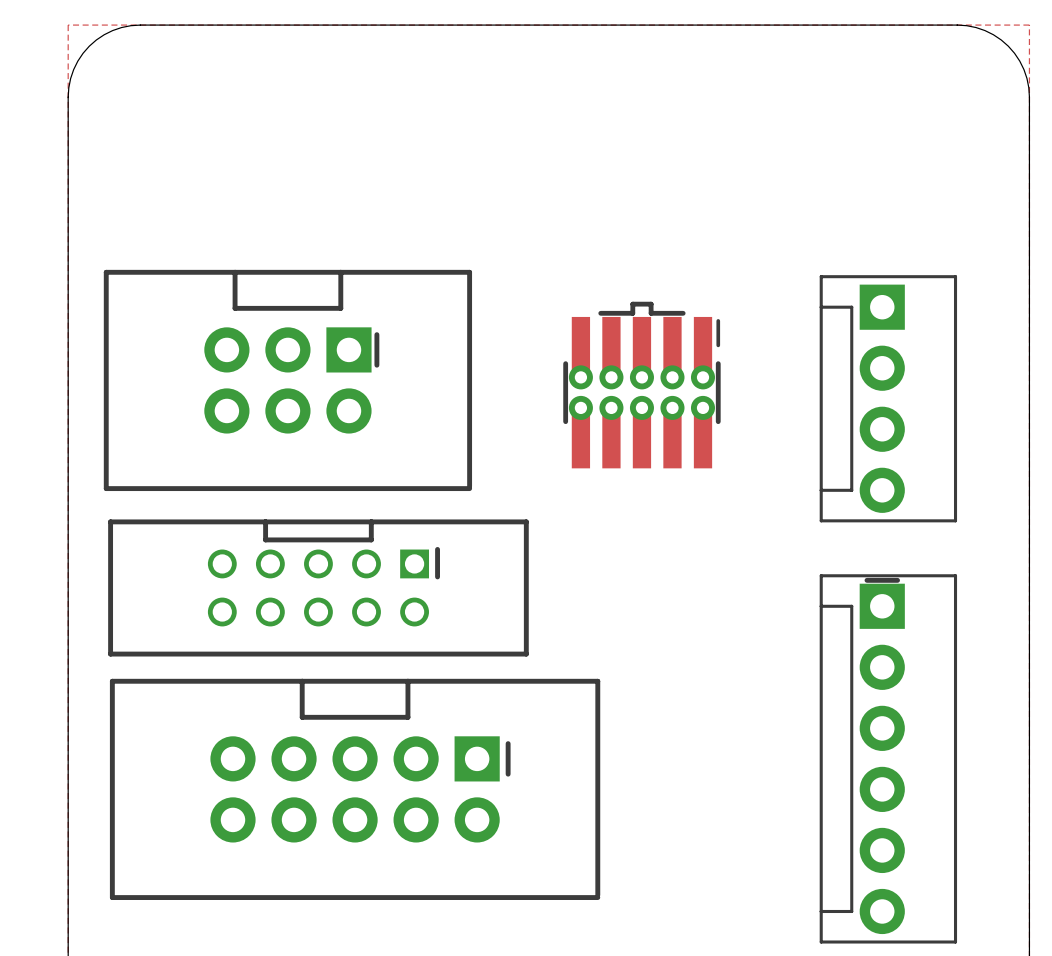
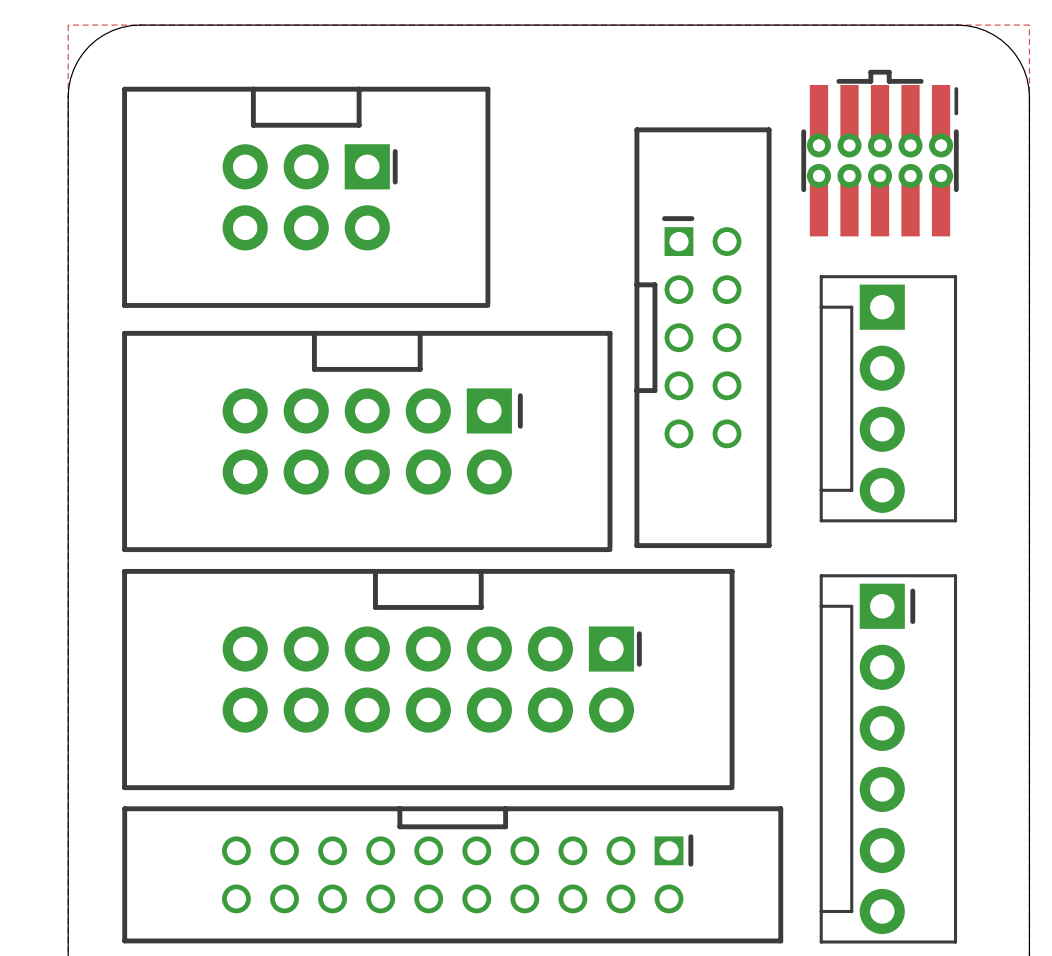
part position: (287, 380) -> (306, 197)
part position: (641, 385) -> (880, 153)
part footprint: [819, 574, 958, 944] -> [819, 574, 958, 944]
part rotation: 0° (318, 587) -> 90° counterclockwise (703, 337)
part position: (318, 587) -> (703, 337)
part: none -> (428, 679)
part position: (355, 789) -> (367, 441)
part: none -> (452, 874)

